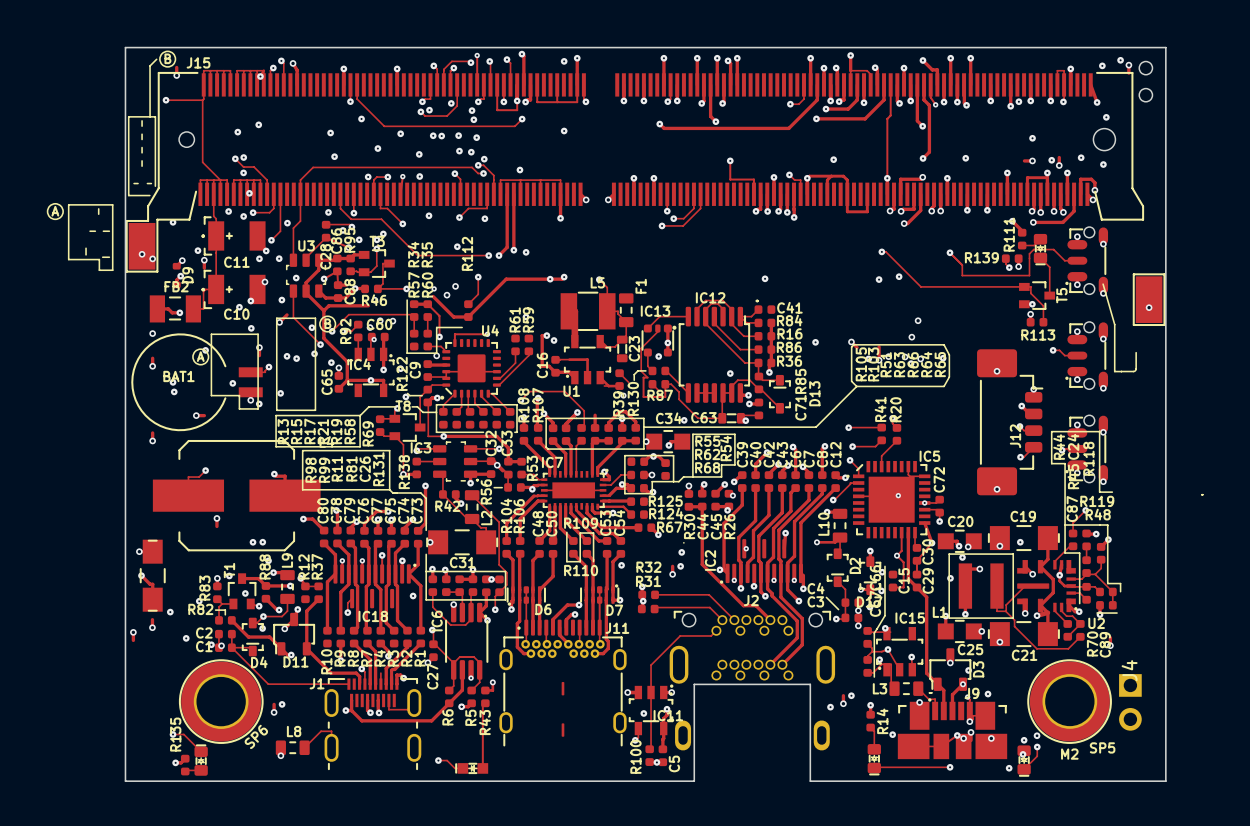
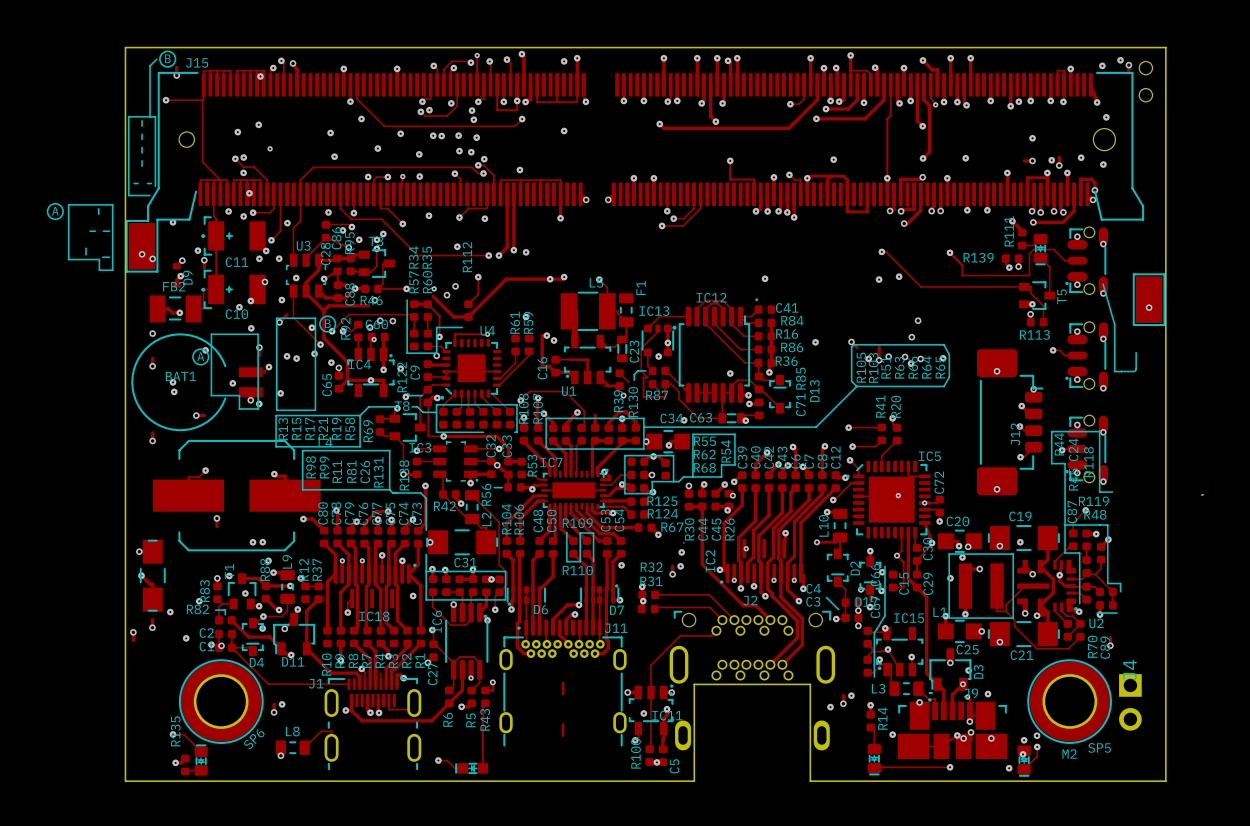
via: none -> (270, 148)

